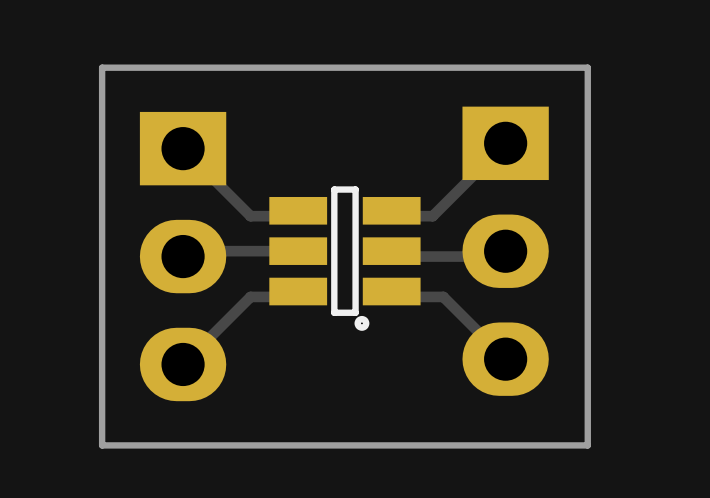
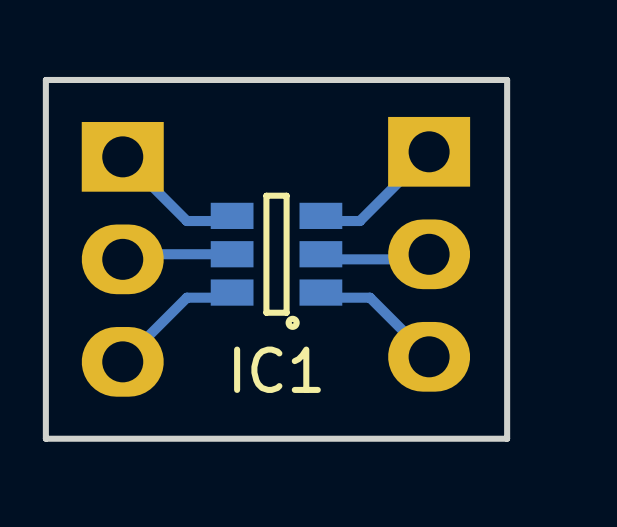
part: (344, 258) -> none
IC1: none -> (276, 261)

